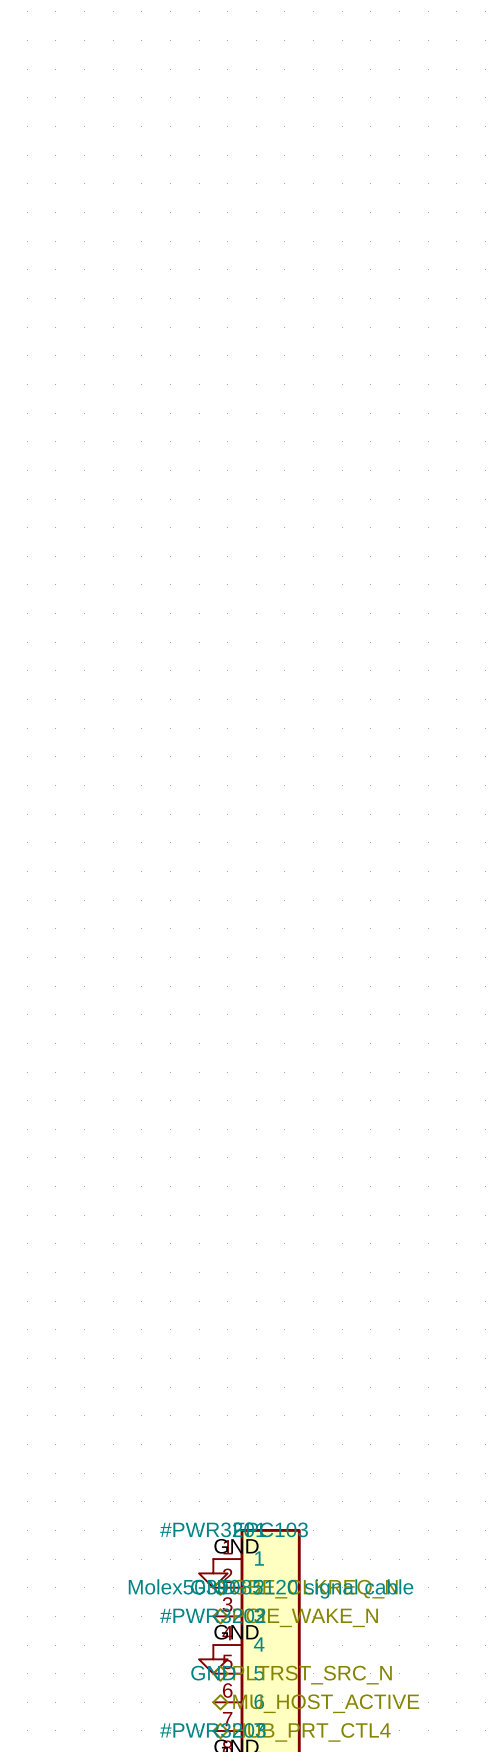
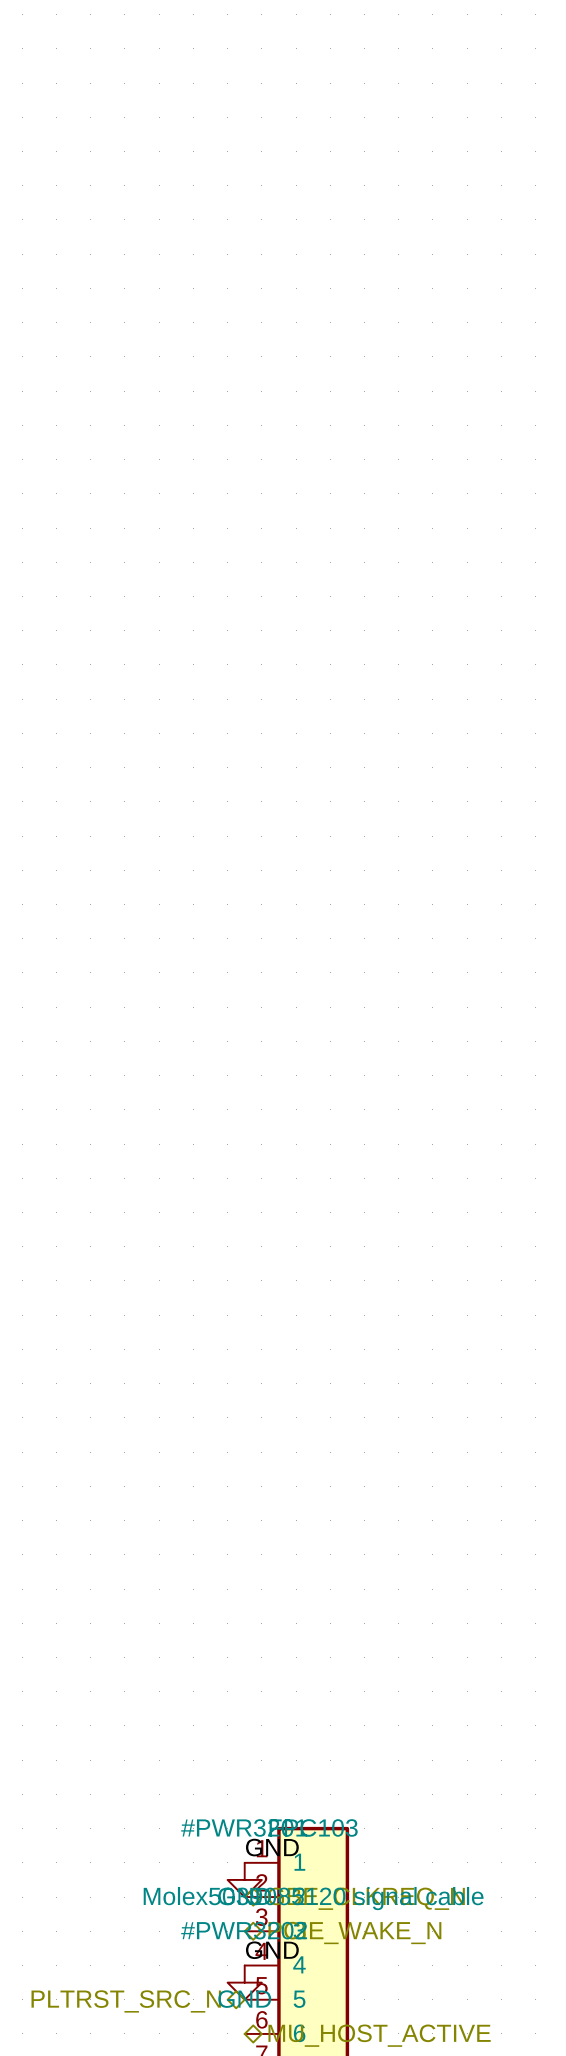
hierarchical label rotation: 0° (312, 1675) -> 180° (126, 2001)
hierarchical label position: PLTRST_SRC_N (312, 1675) -> PLTRST_SRC_N (126, 2001)

